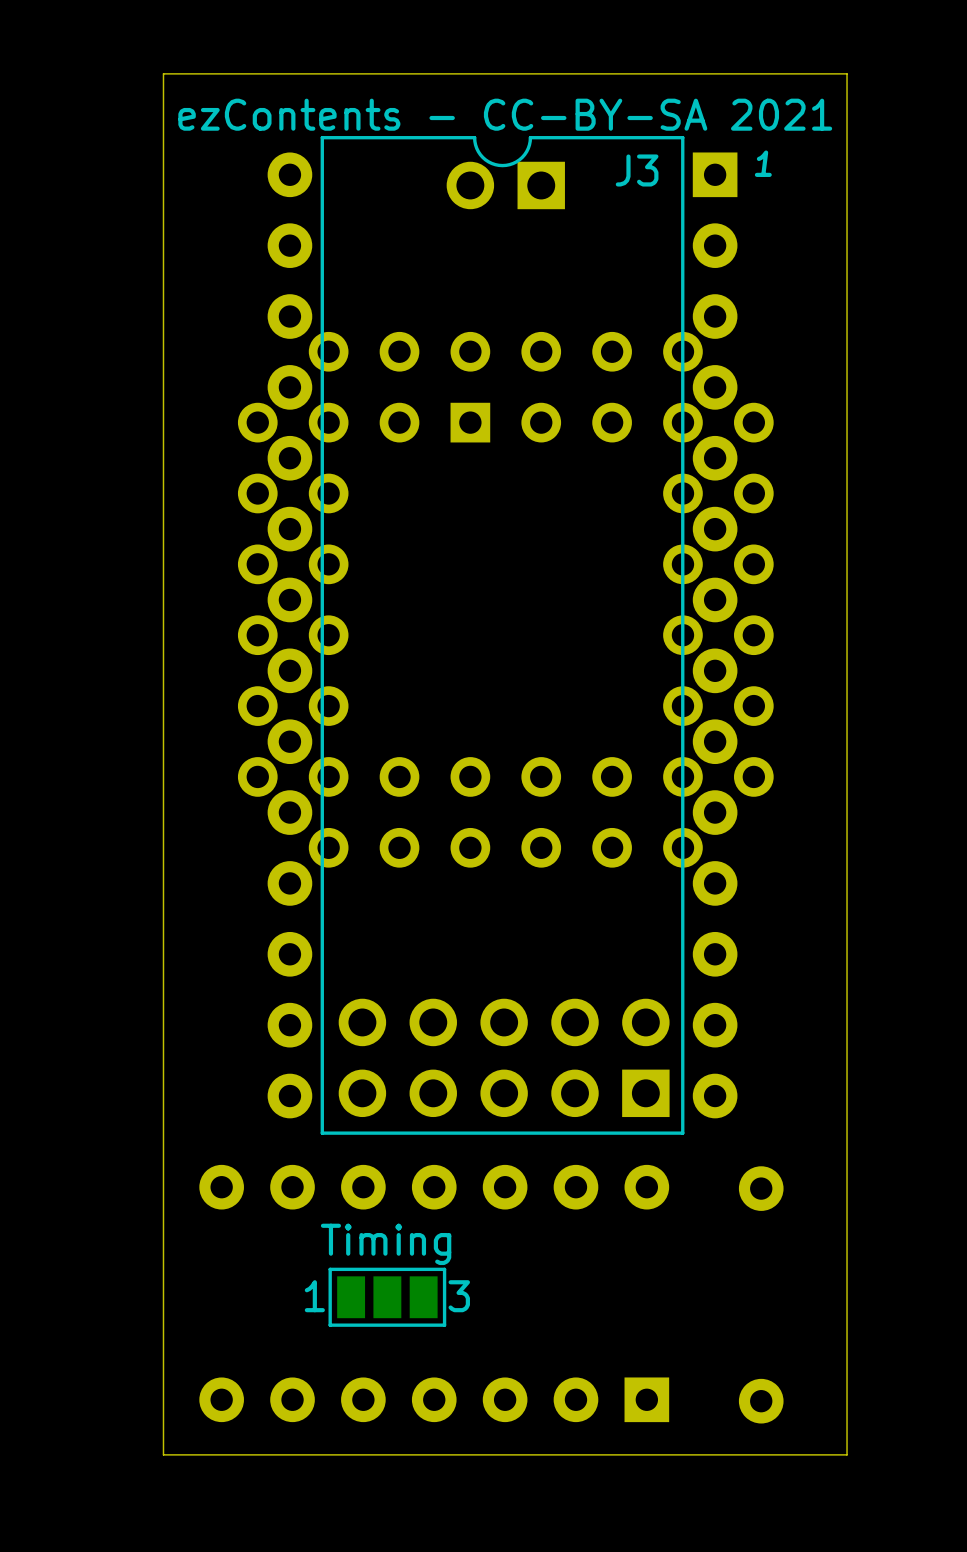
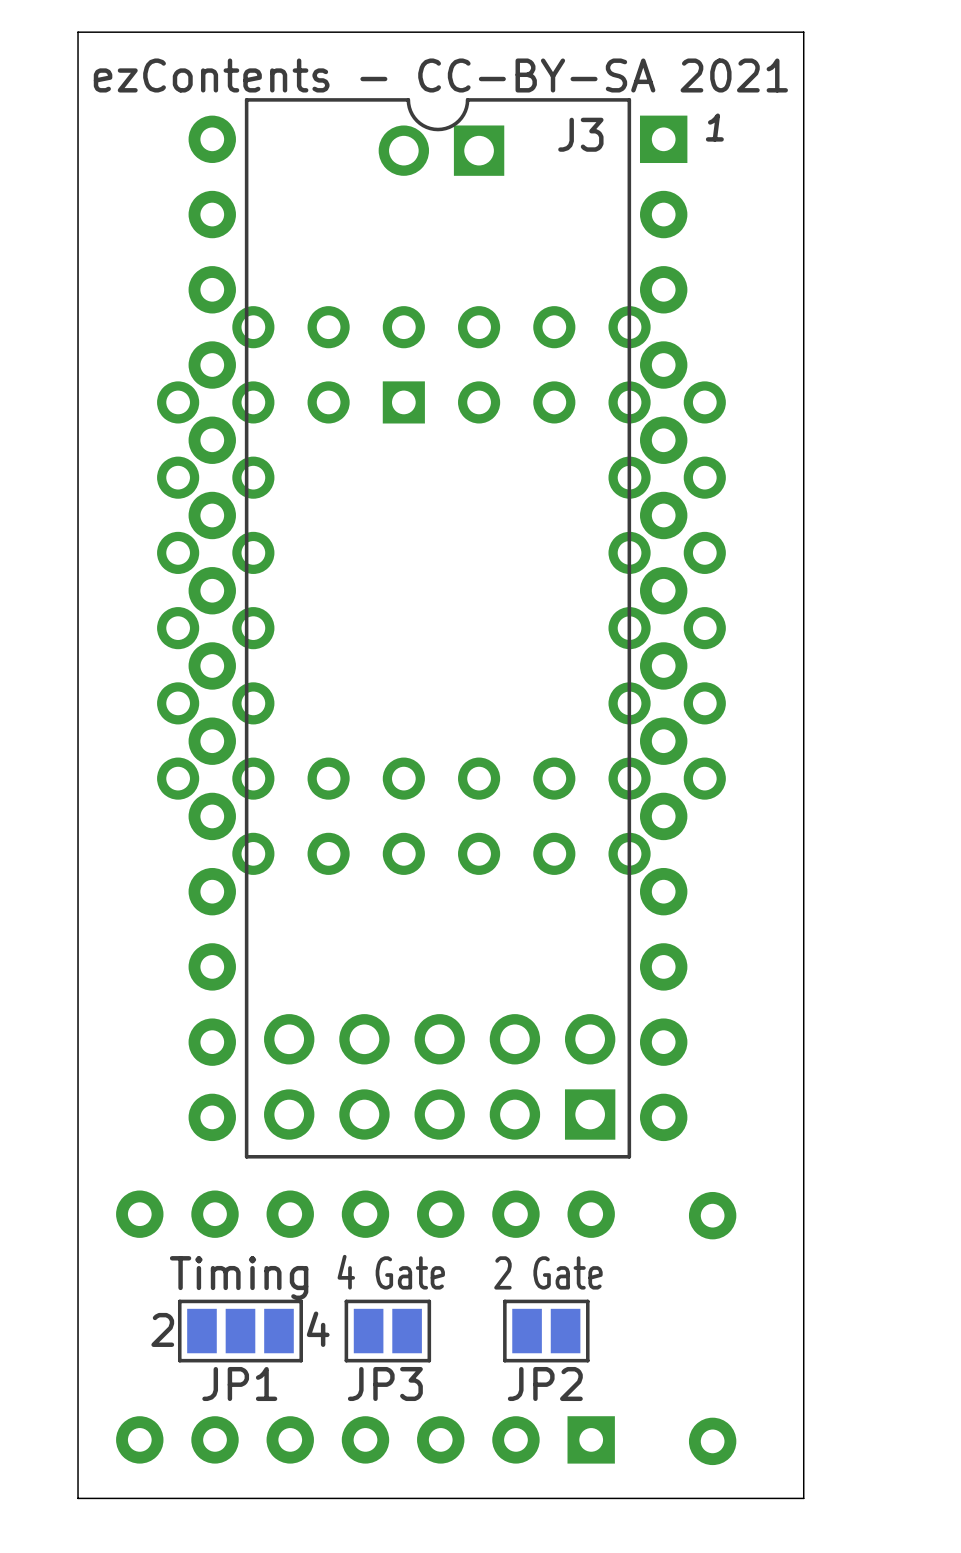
text: none -> 4 Gate (391, 1272)
text: none -> 2 Gate (548, 1272)
text position: Timing (386, 1244) -> Timing (239, 1278)
JP1: none -> (240, 1331)
part: (387, 1297) -> none
JP3: none -> (387, 1331)
JP2: none -> (546, 1331)

